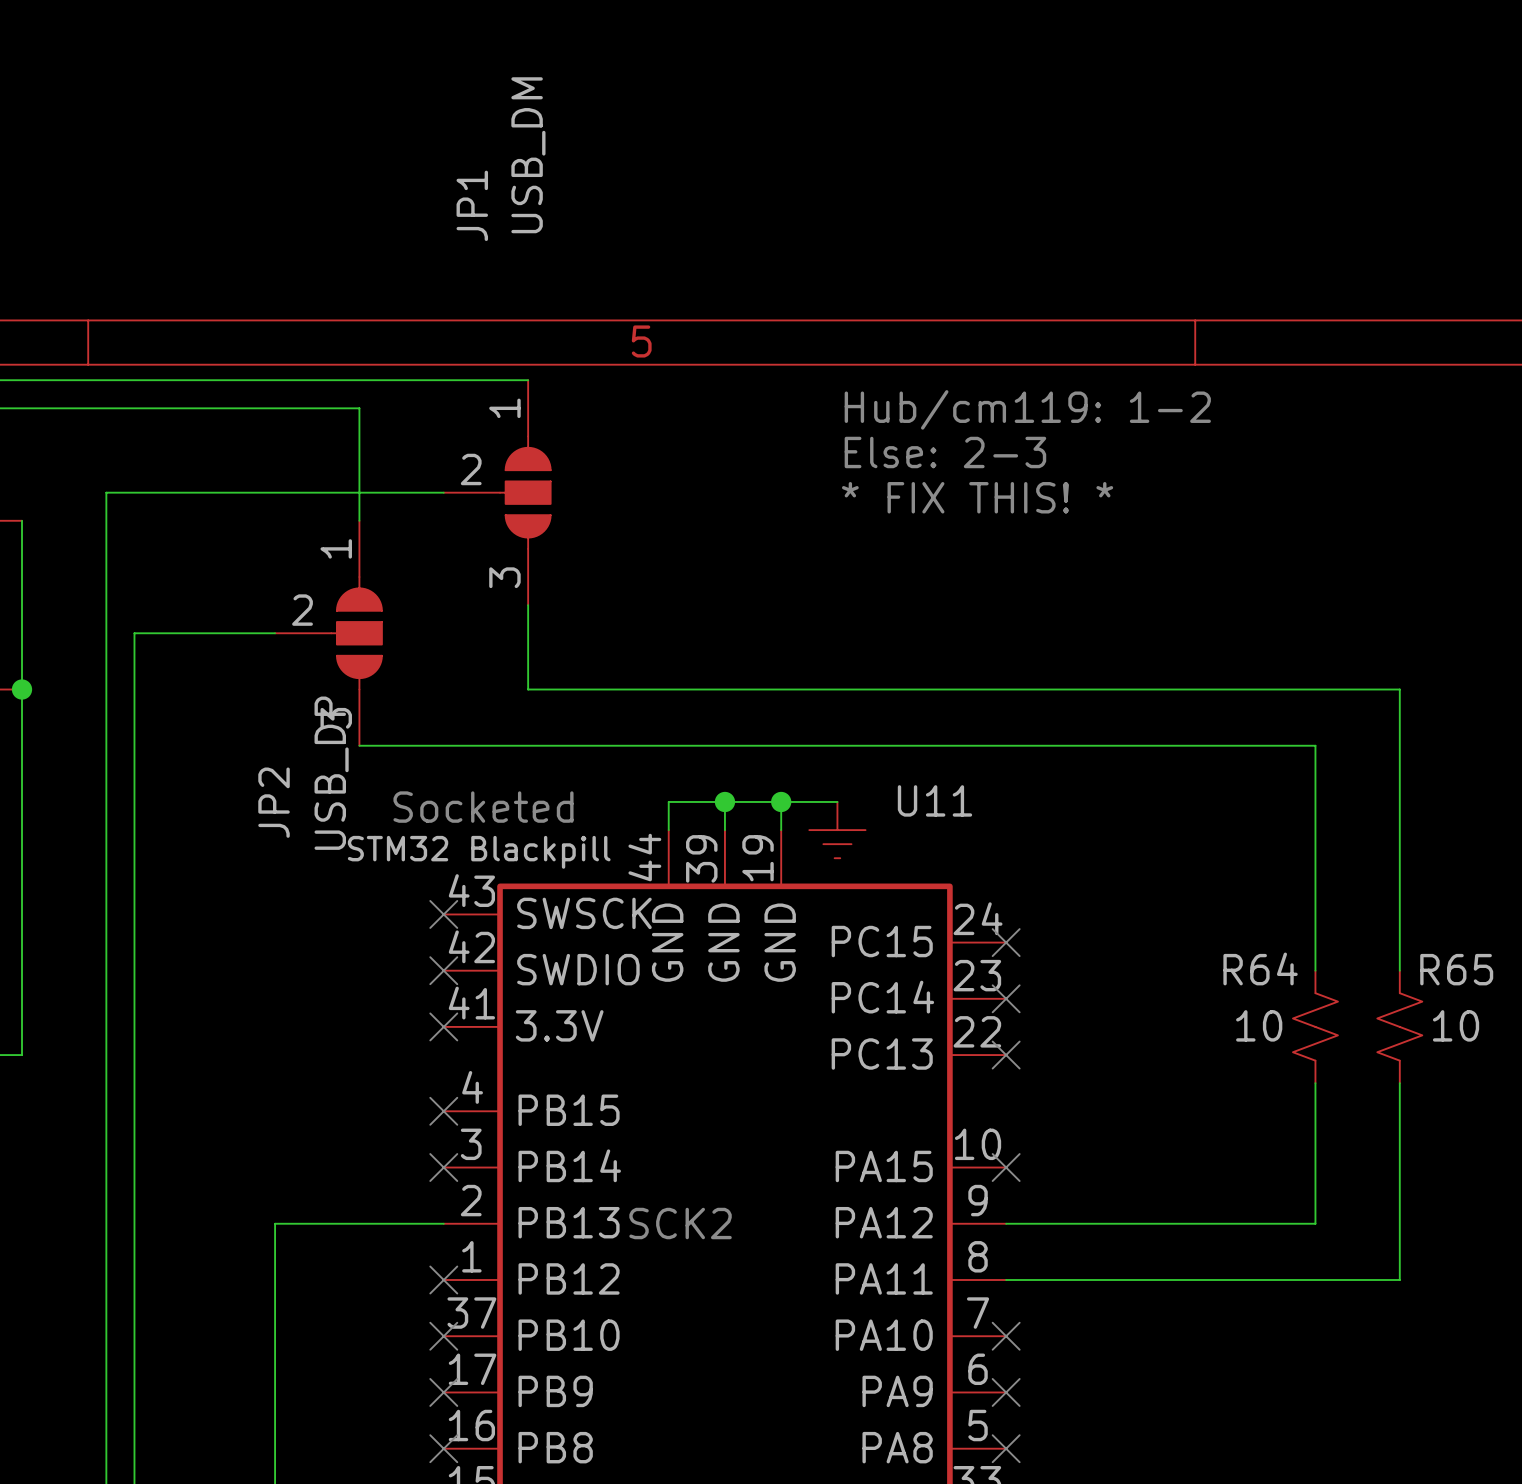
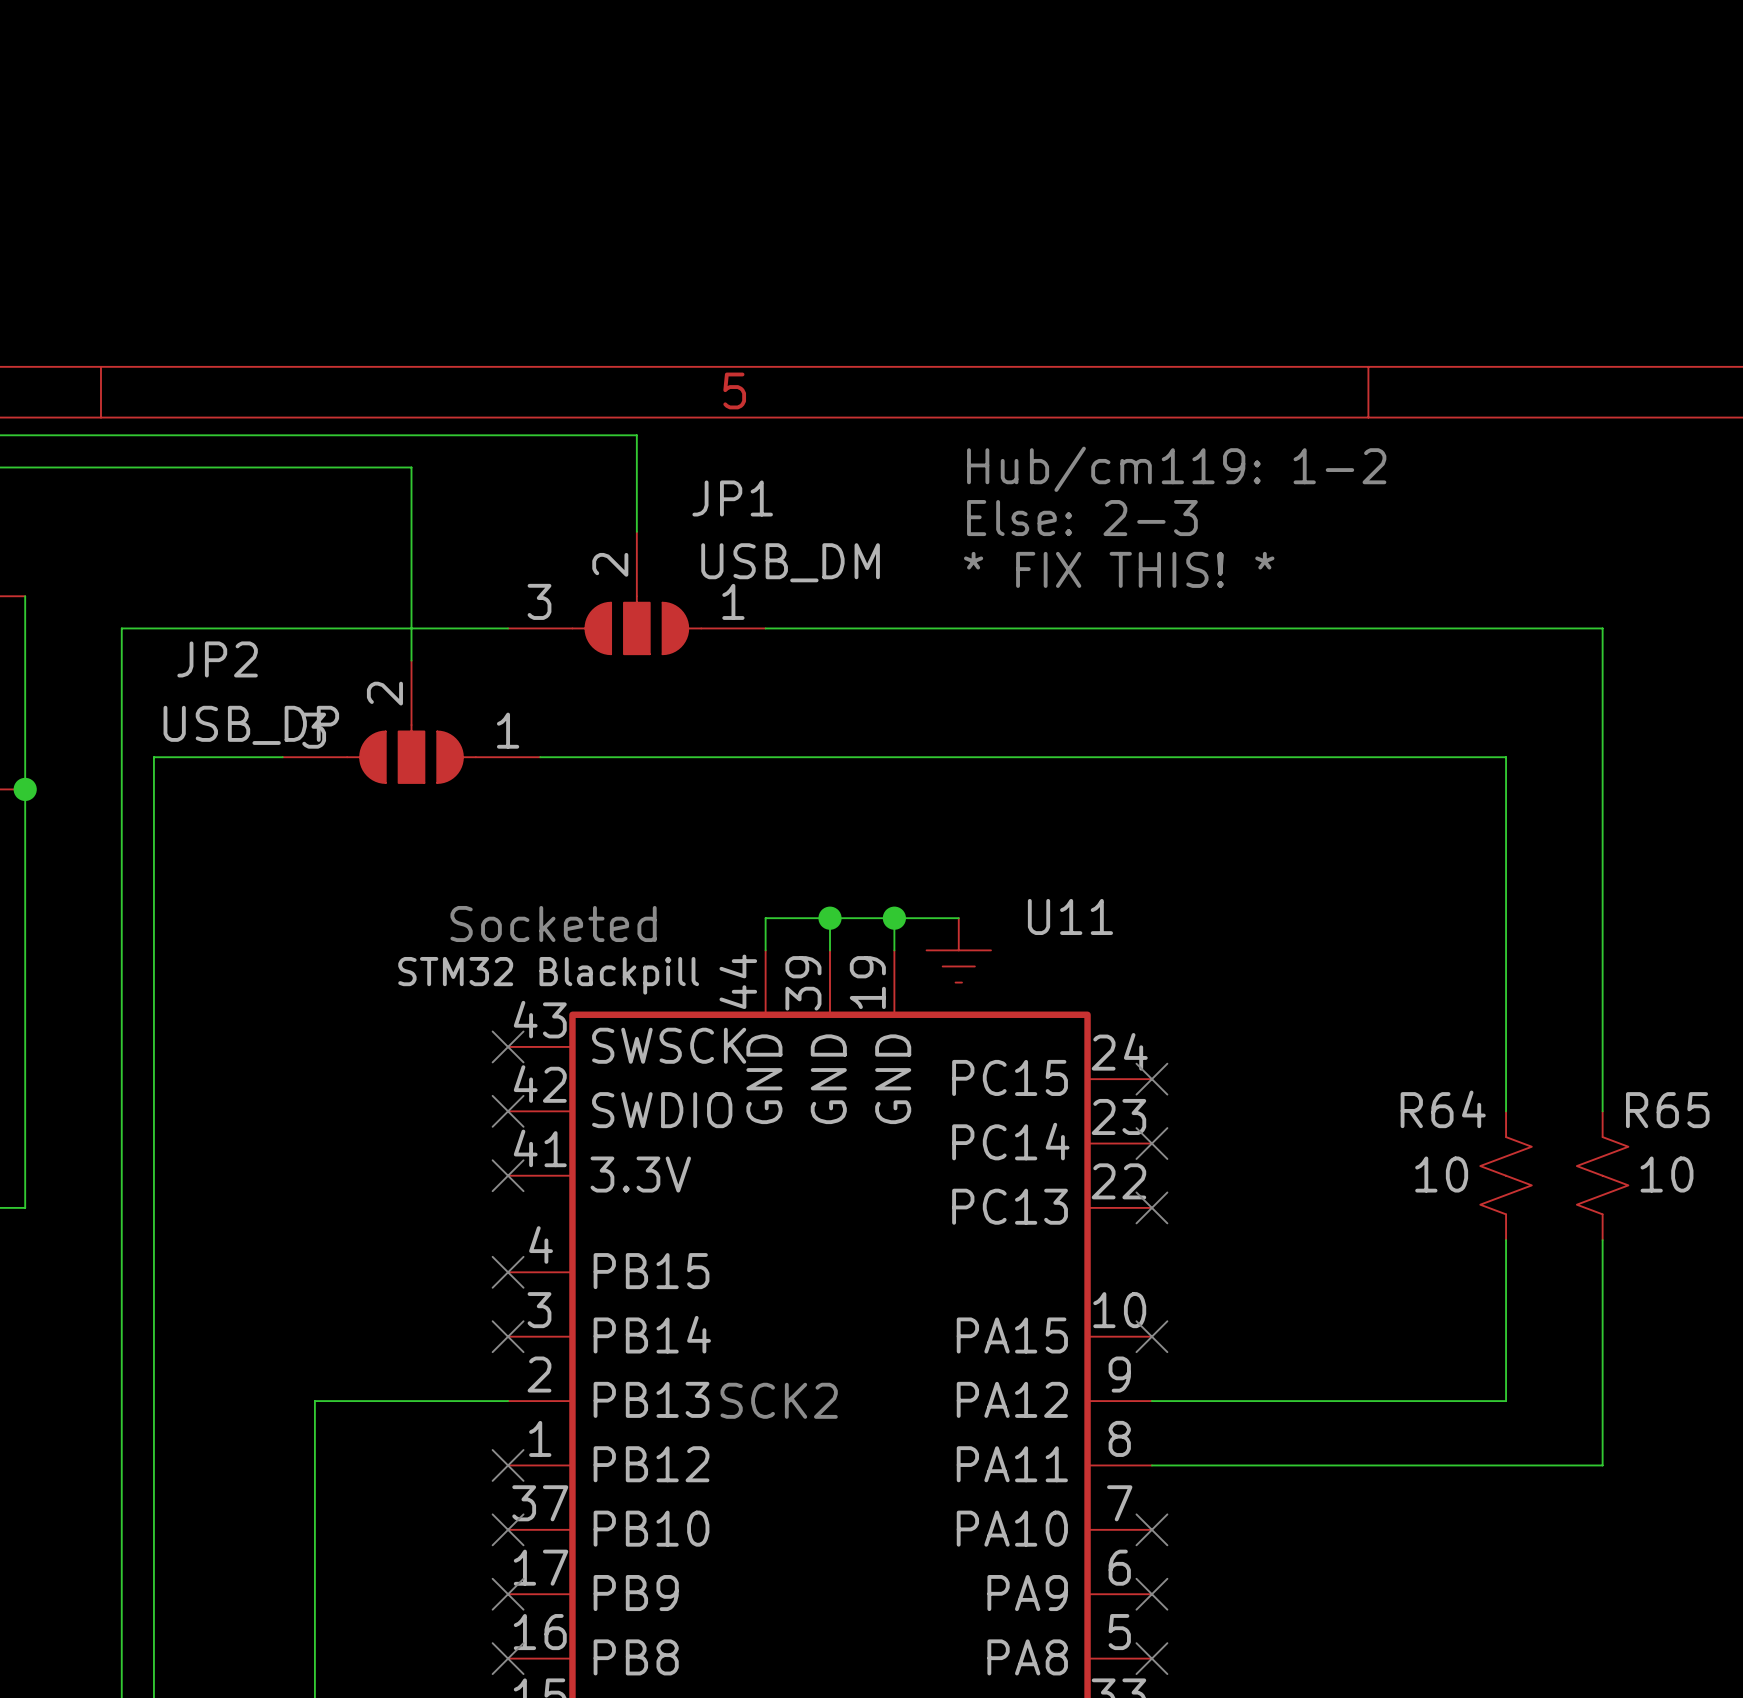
JP1 value position: USB_DM (528, 155) -> USB_DM (790, 562)
JP1 name position: JP1 (472, 205) -> JP1 (732, 498)
wire: none -> (604, 435) (636, 435) (636, 531)
wire: (443, 492) (106, 492) (106, 548) -> (508, 628) (121, 628)
JP1 rotation: 0° (525, 492) -> 90° clockwise (636, 625)
wire: (528, 605) (528, 689) (1399, 689) -> (765, 628) (1602, 628) (1602, 789)
wire: (275, 633) (134, 633) (134, 661) -> (282, 757) (153, 757)
JP2 rotation: 0° (356, 633) -> 90° clockwise (411, 754)
wire: (359, 745) (1315, 745) -> (540, 757) (1506, 757) (1506, 853)

